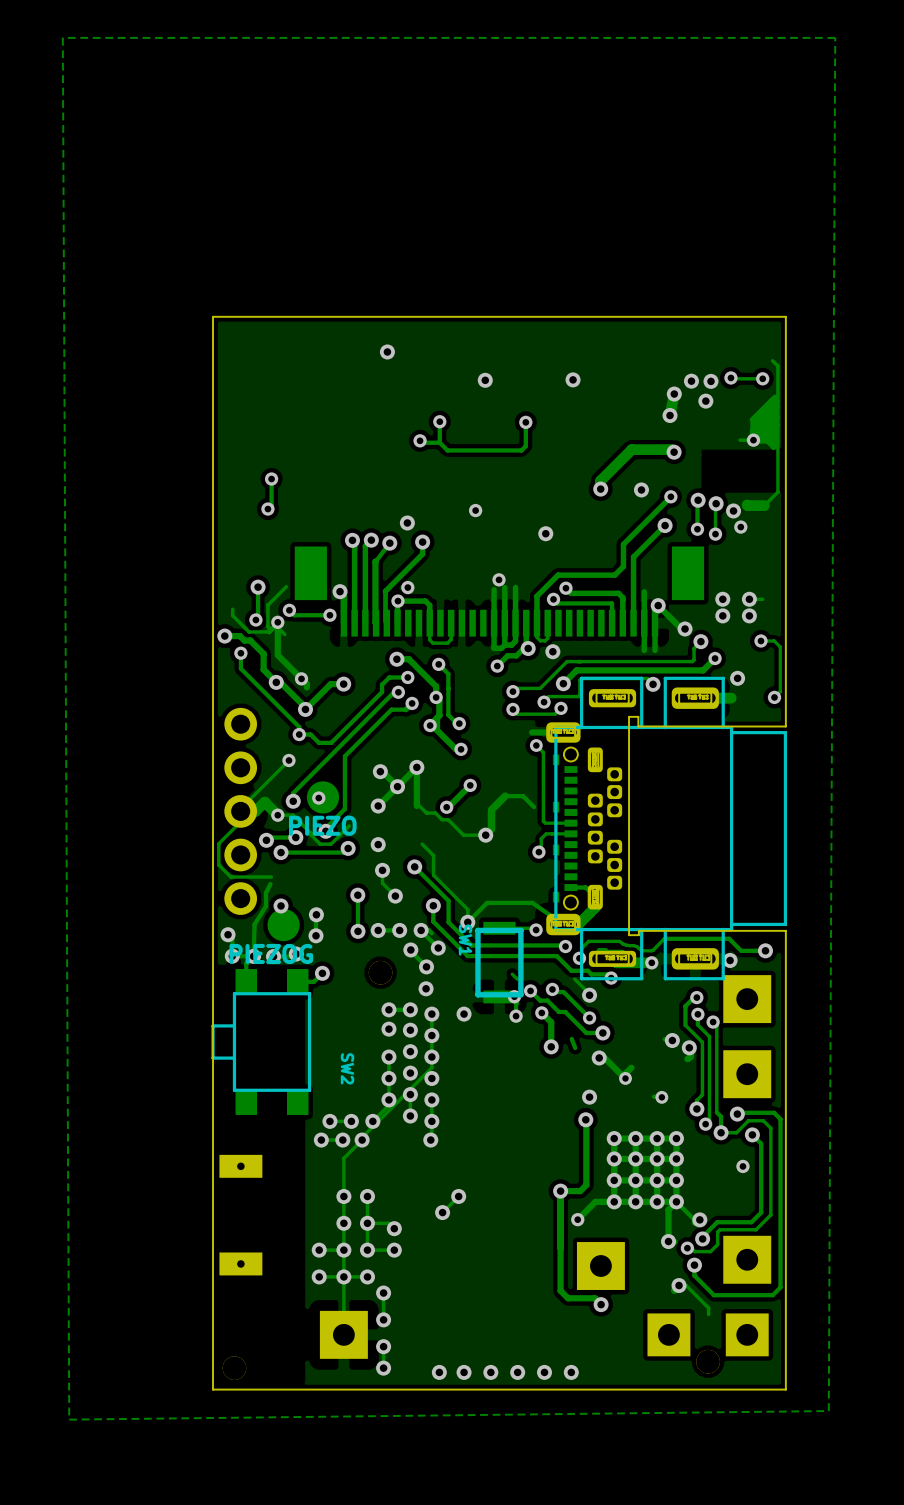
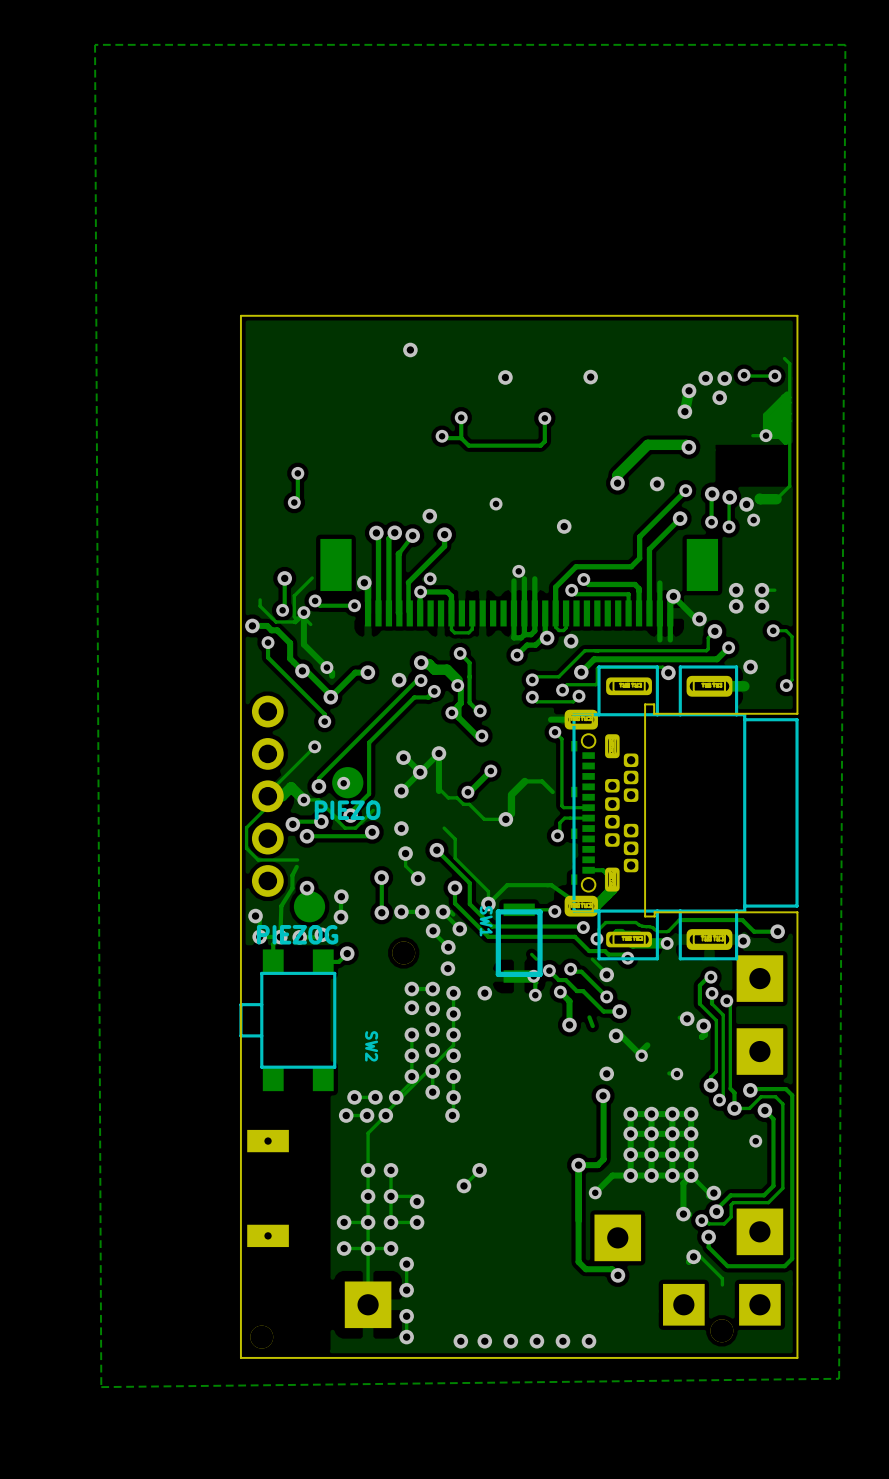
track: (396, 659) (408, 659) (436, 686) (436, 692) -> (421, 662) (428, 664) (434, 669) (447, 669) (457, 680)
via position: (396, 659) -> (421, 662)
track: (407, 677) (389, 677) (382, 684) (382, 692) (331, 742) (319, 742) (310, 734) (299, 734) -> none
via: (407, 677) -> none
via: none -> (399, 680)

